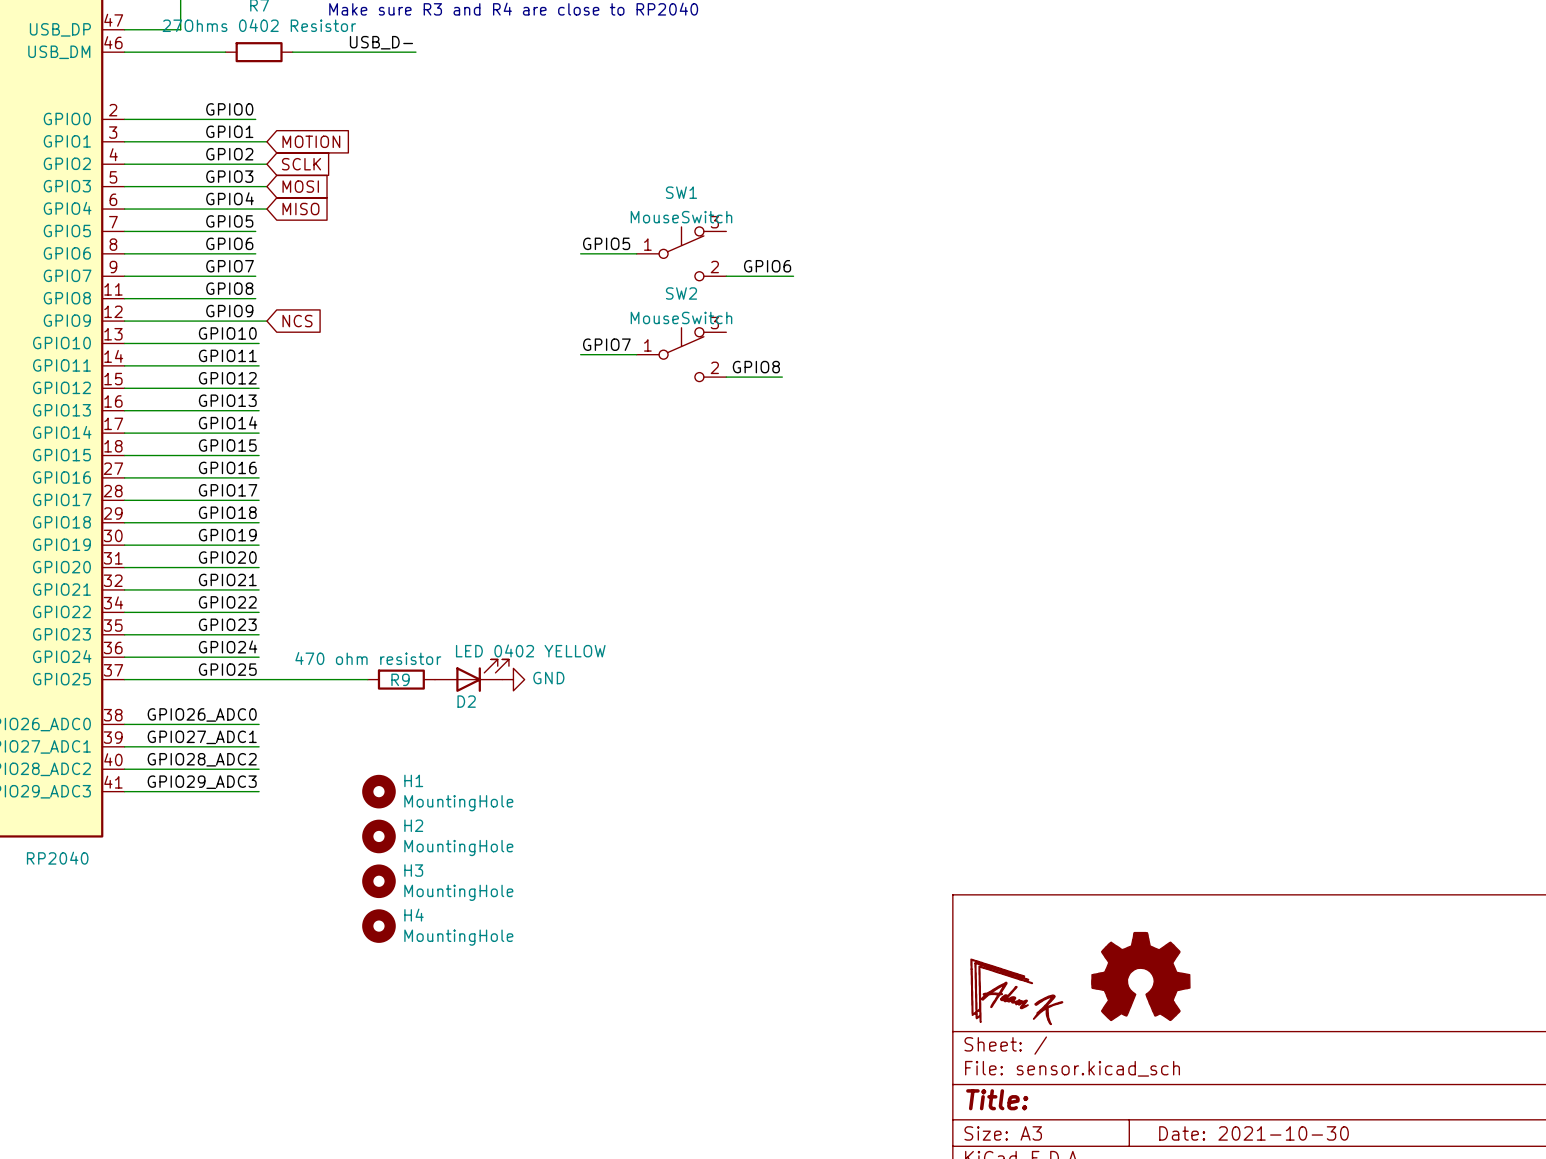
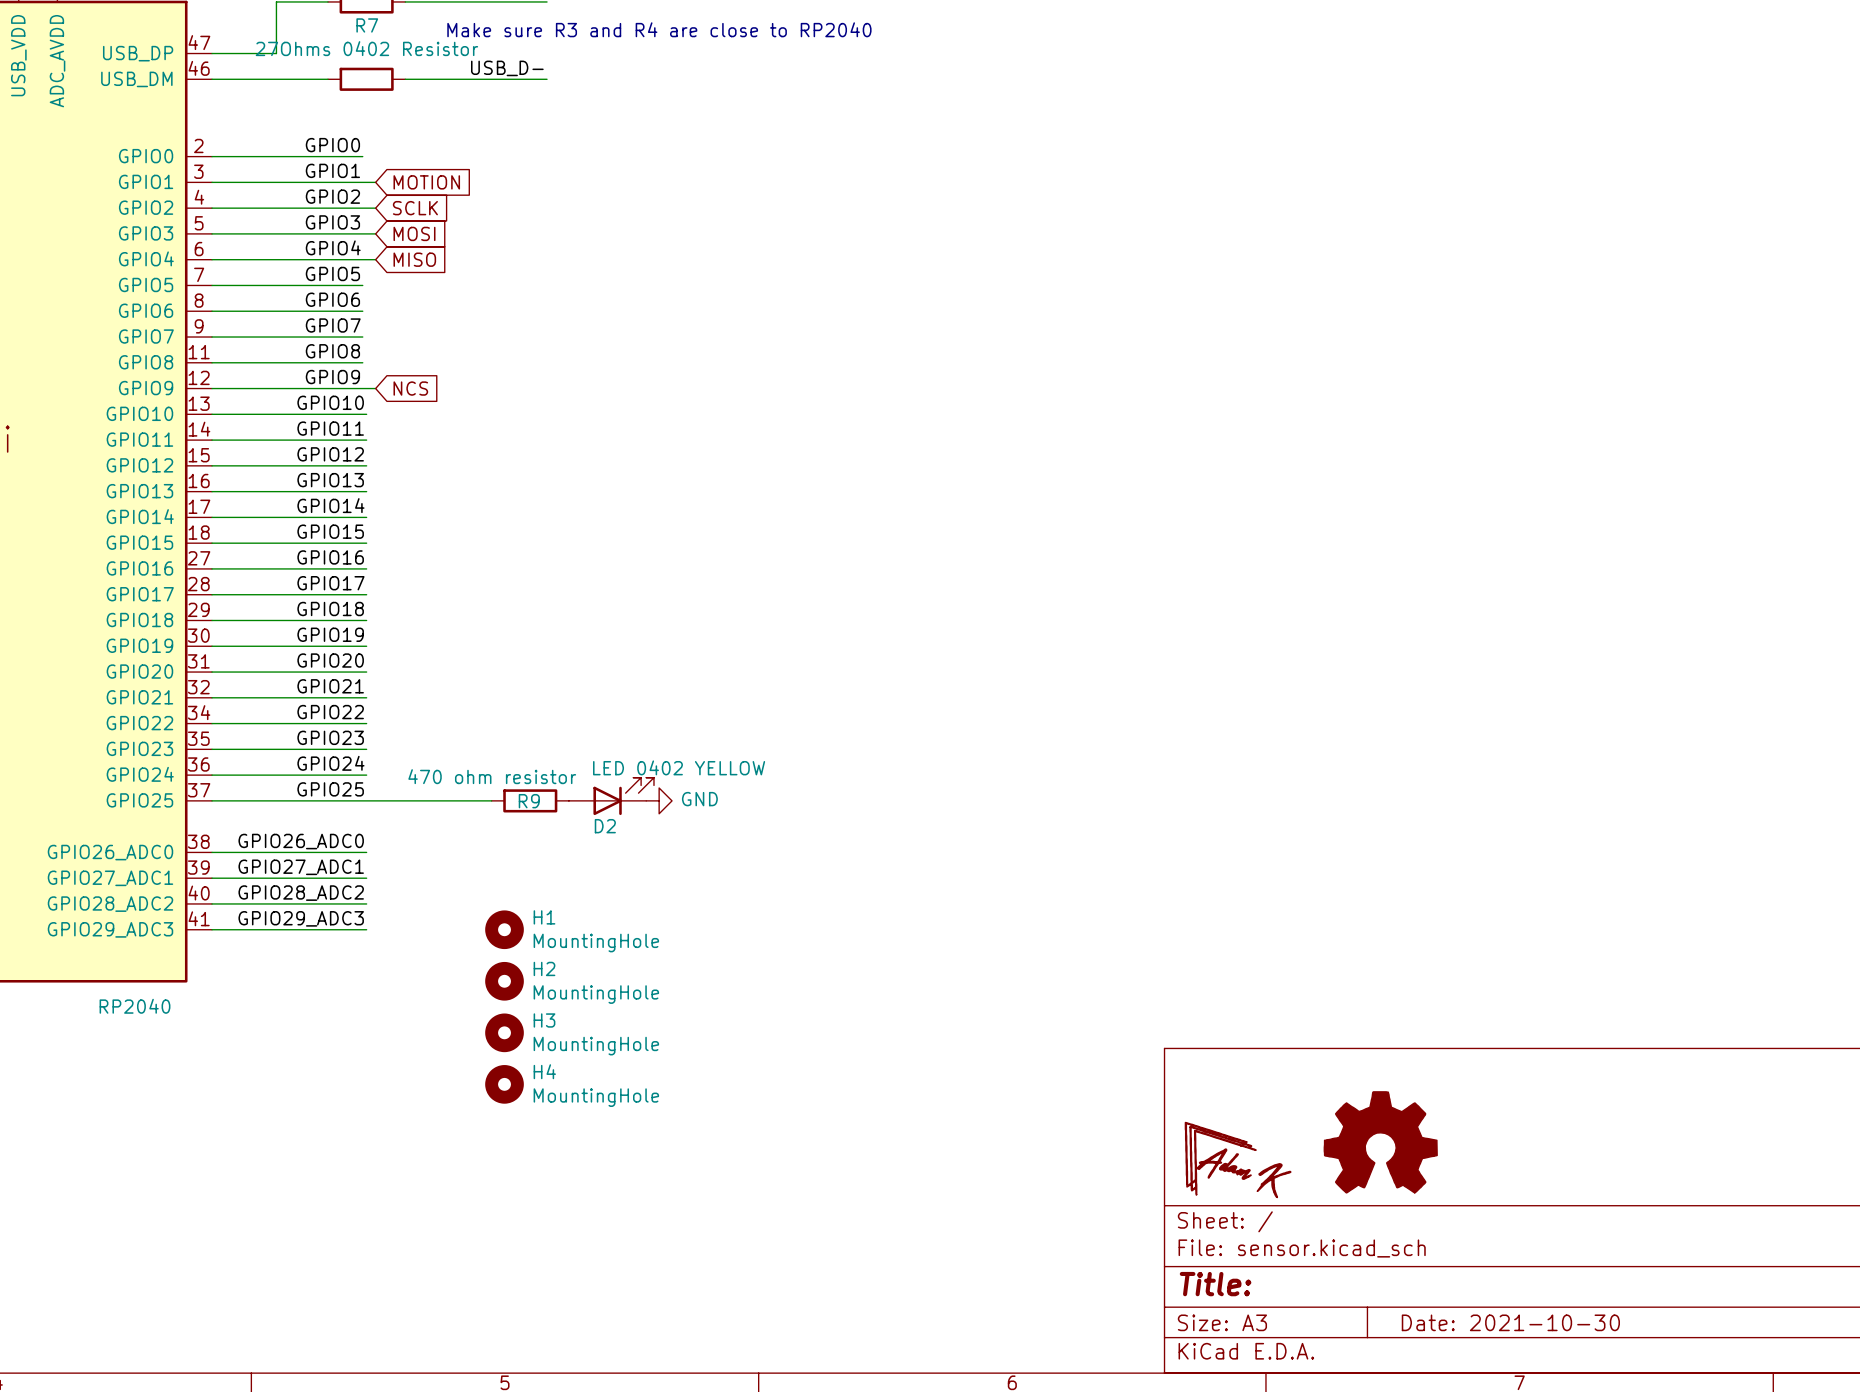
label: GPIO5 (606, 243) -> none
wire: (580, 253) (636, 253) -> none
SW1: MouseSwitch (681, 253) -> none
label: GPIO6 (767, 266) -> none
wire: (726, 276) (793, 276) -> none
label: GPIO7 (606, 344) -> none
wire: (580, 354) (636, 354) -> none
SW2: MouseSwitch (681, 354) -> none
label: GPIO8 (756, 367) -> none
wire: (726, 377) (782, 377) -> none

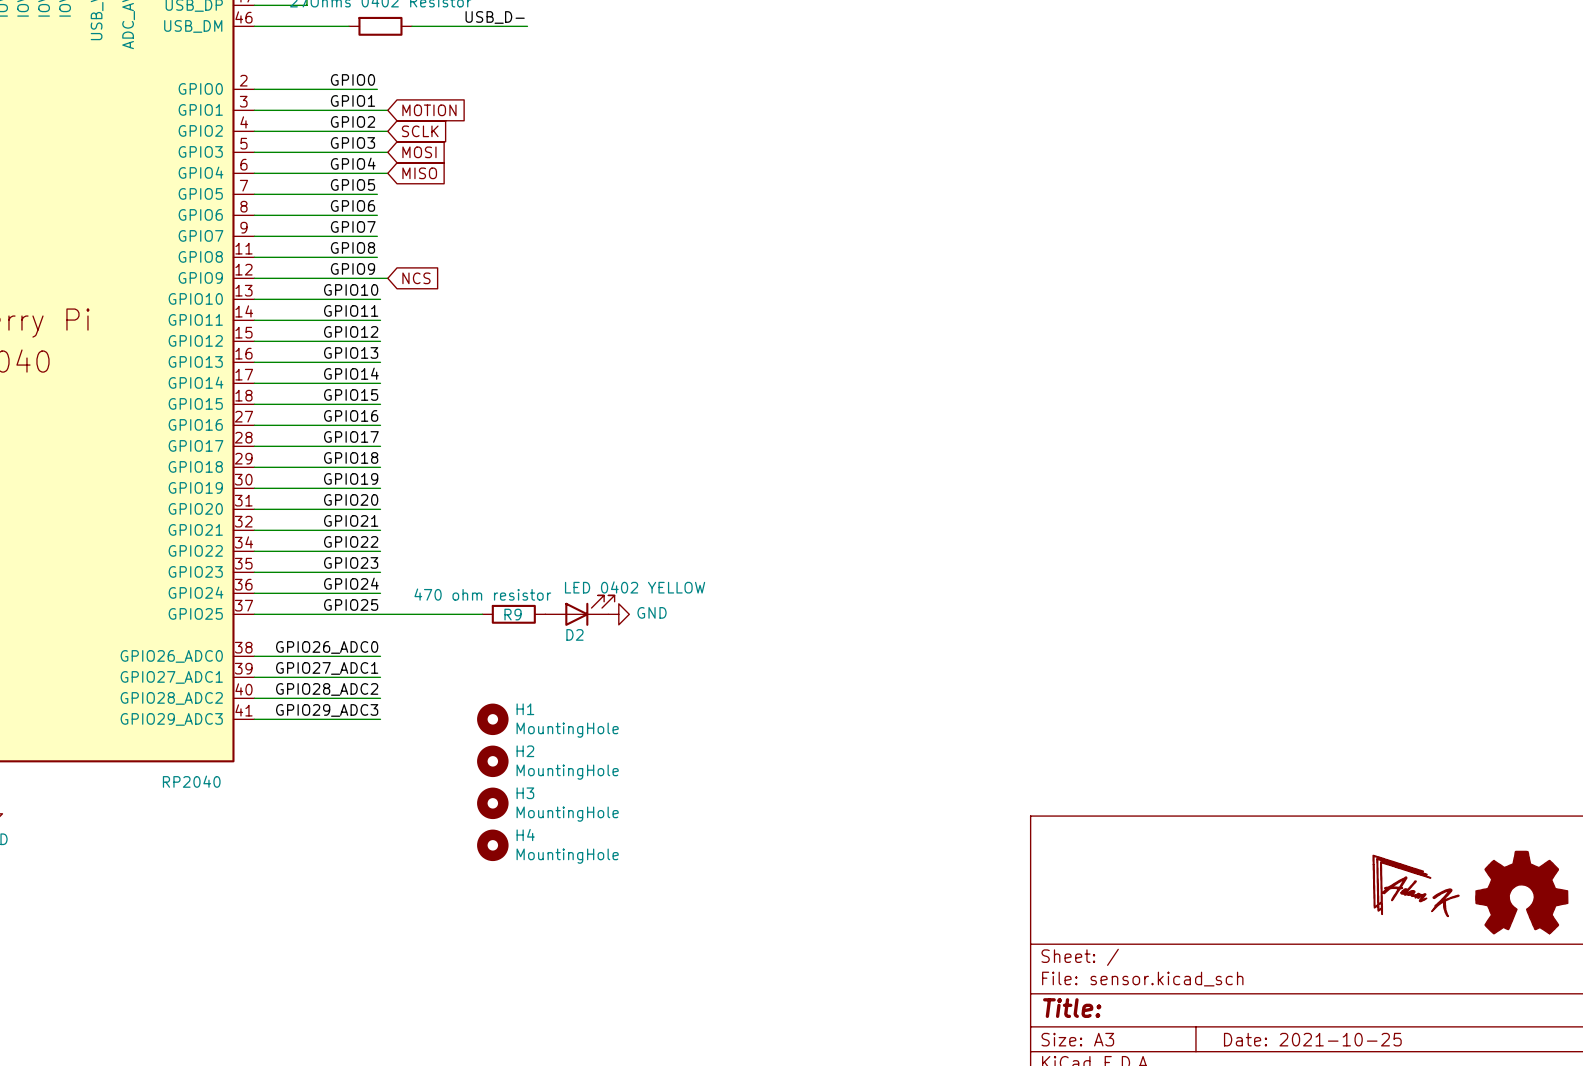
power symbol: none -> (1416, 885)
power symbol: (1380, 1142) -> none
power symbol: none -> (1521, 892)
power symbol: (1238, 1160) -> none
title block: Date: 2021-10-30 (1510, 1322) -> Date: 2021-10-25 (1312, 1039)

